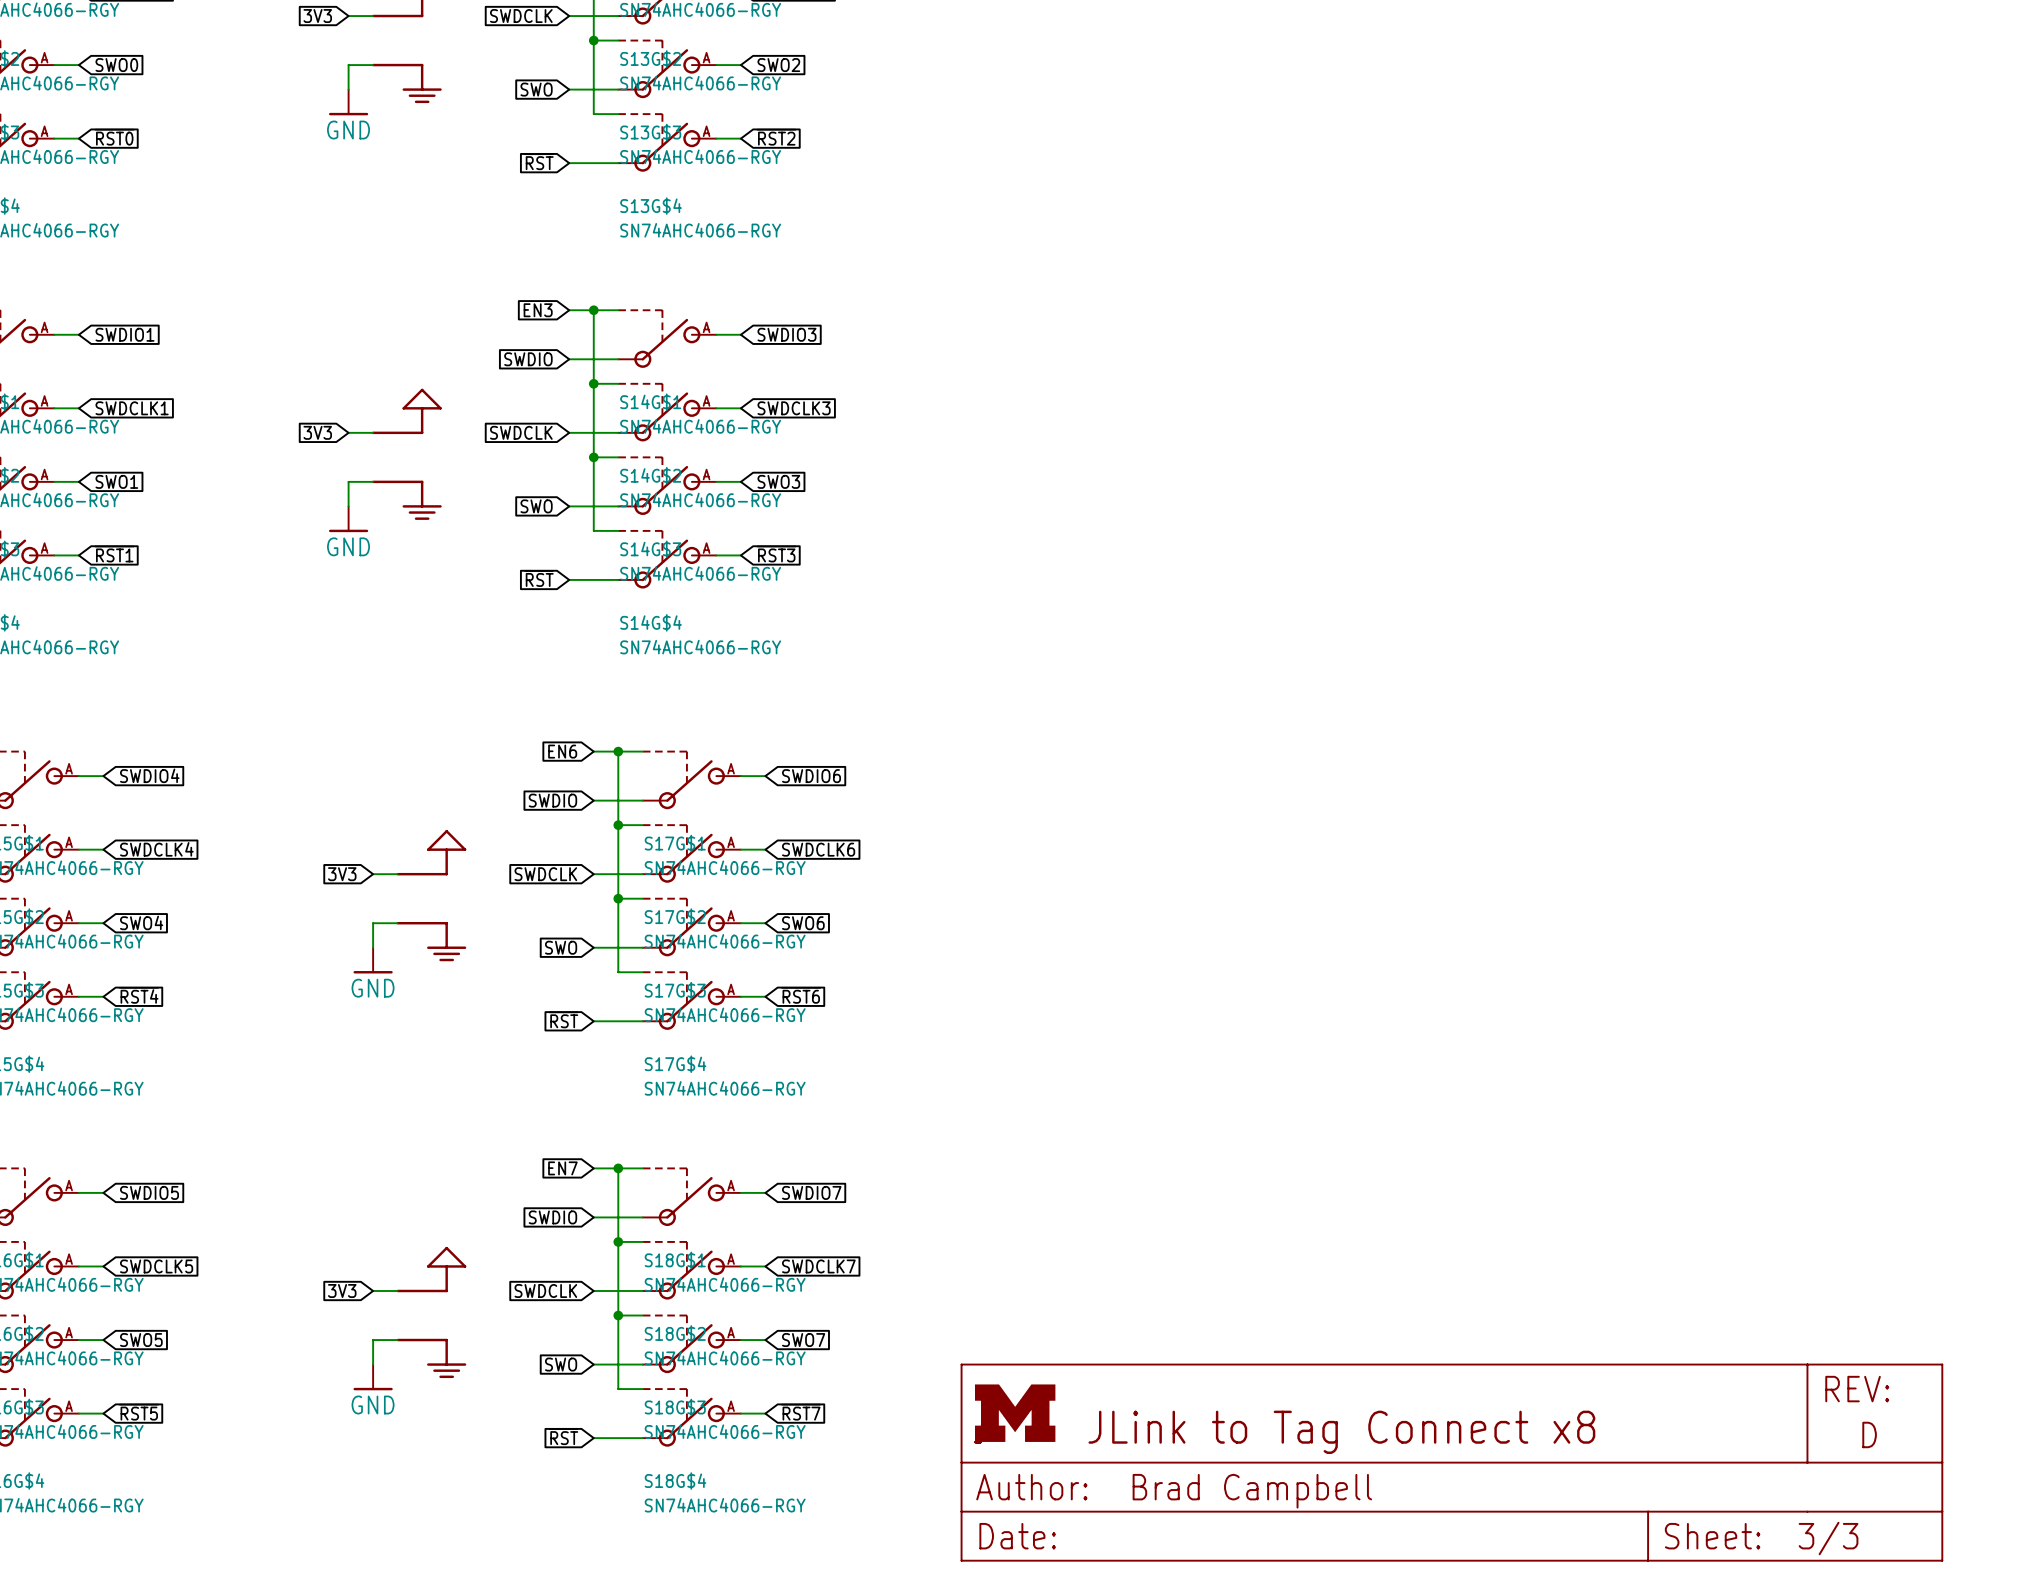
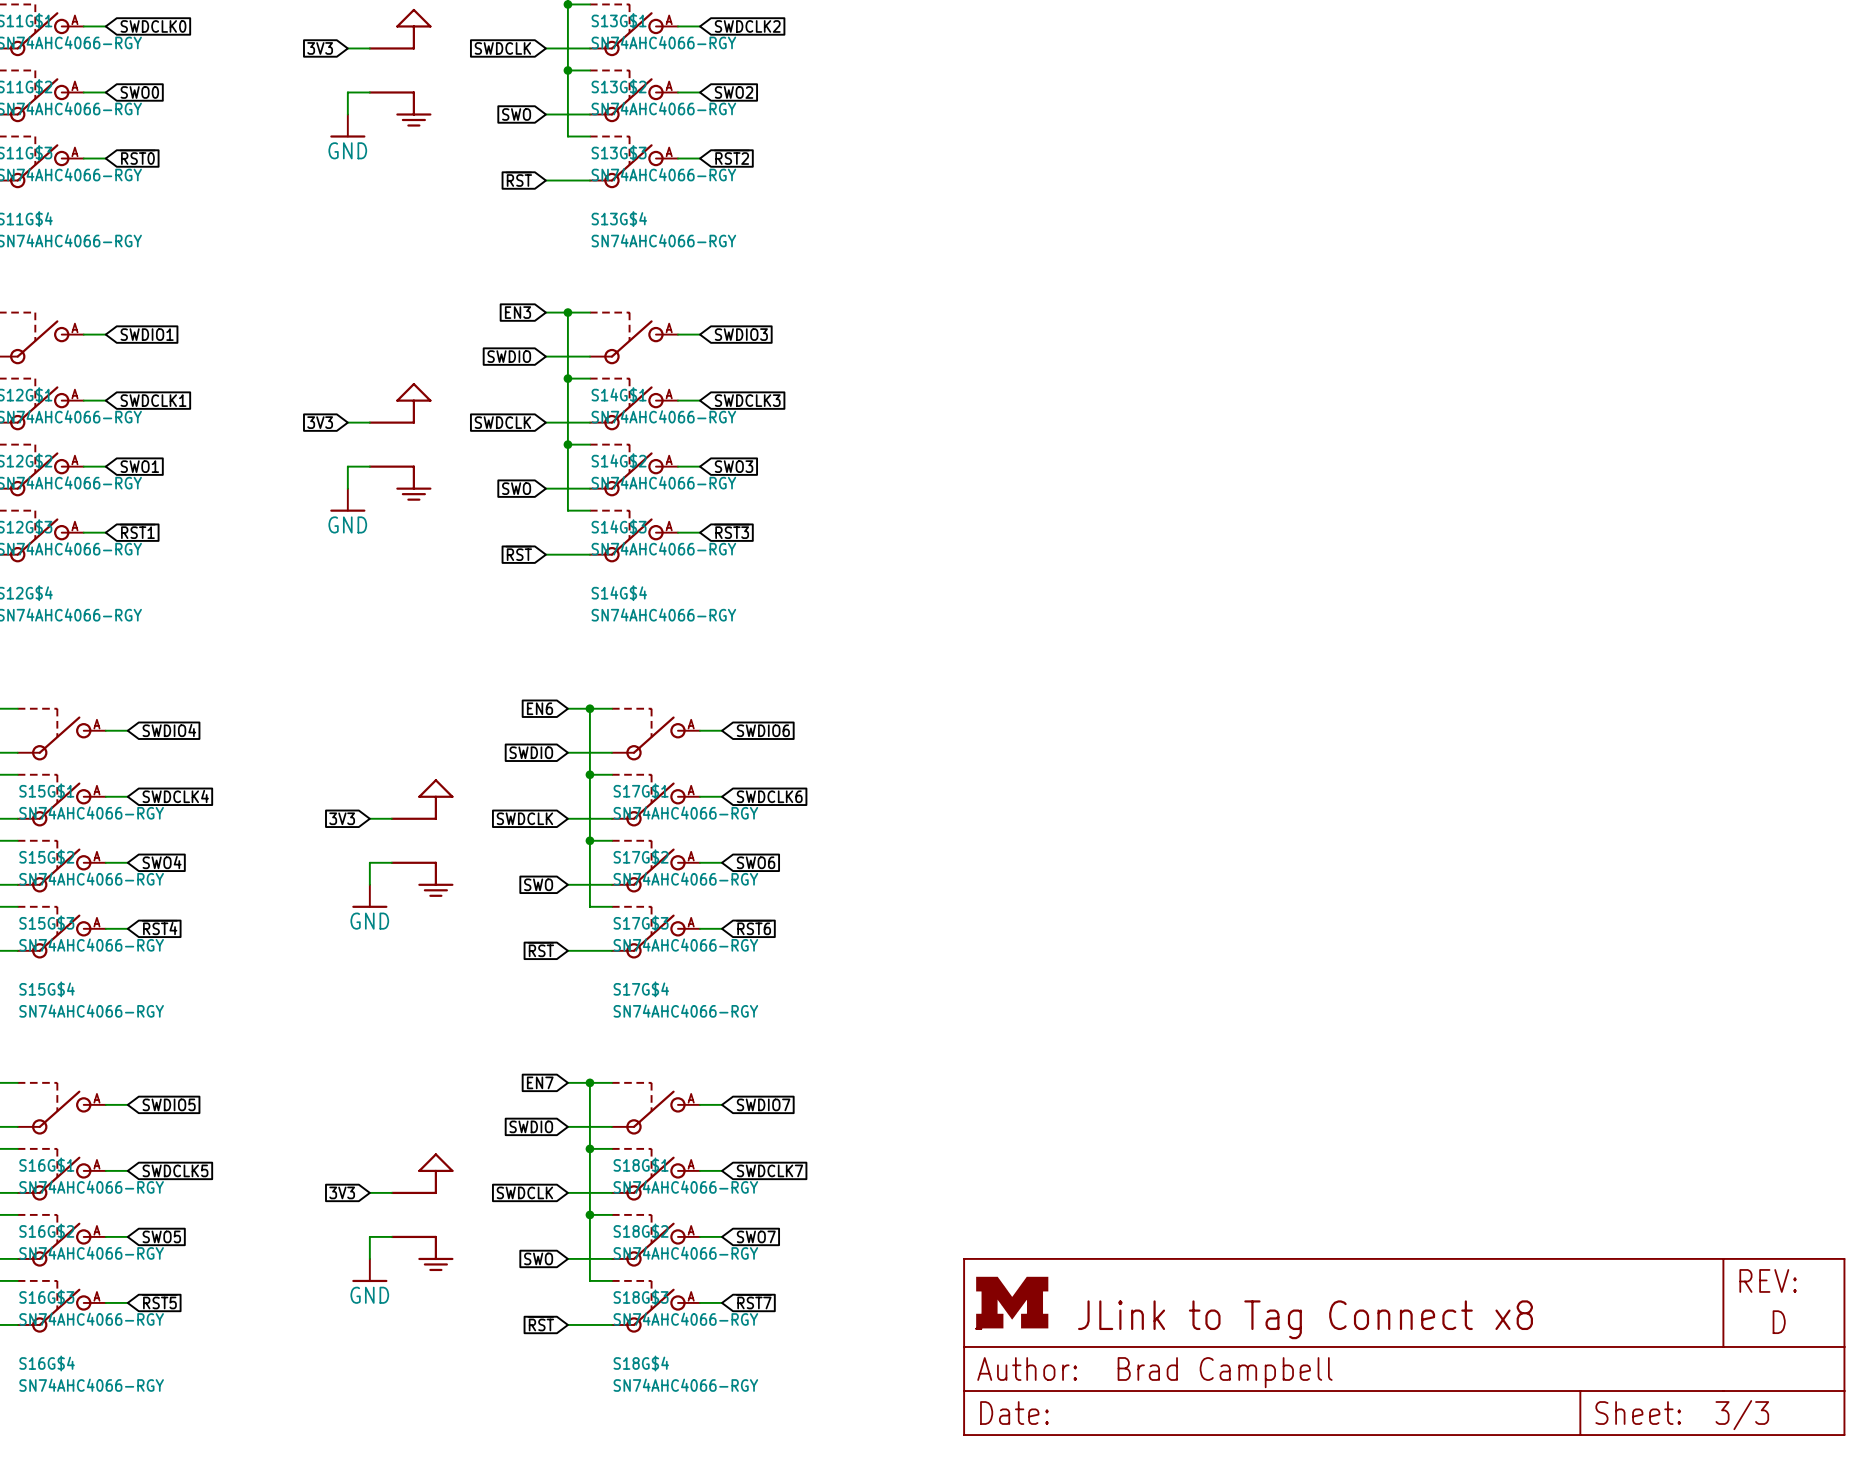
part position: (1451, 1462) -> (1404, 1346)

